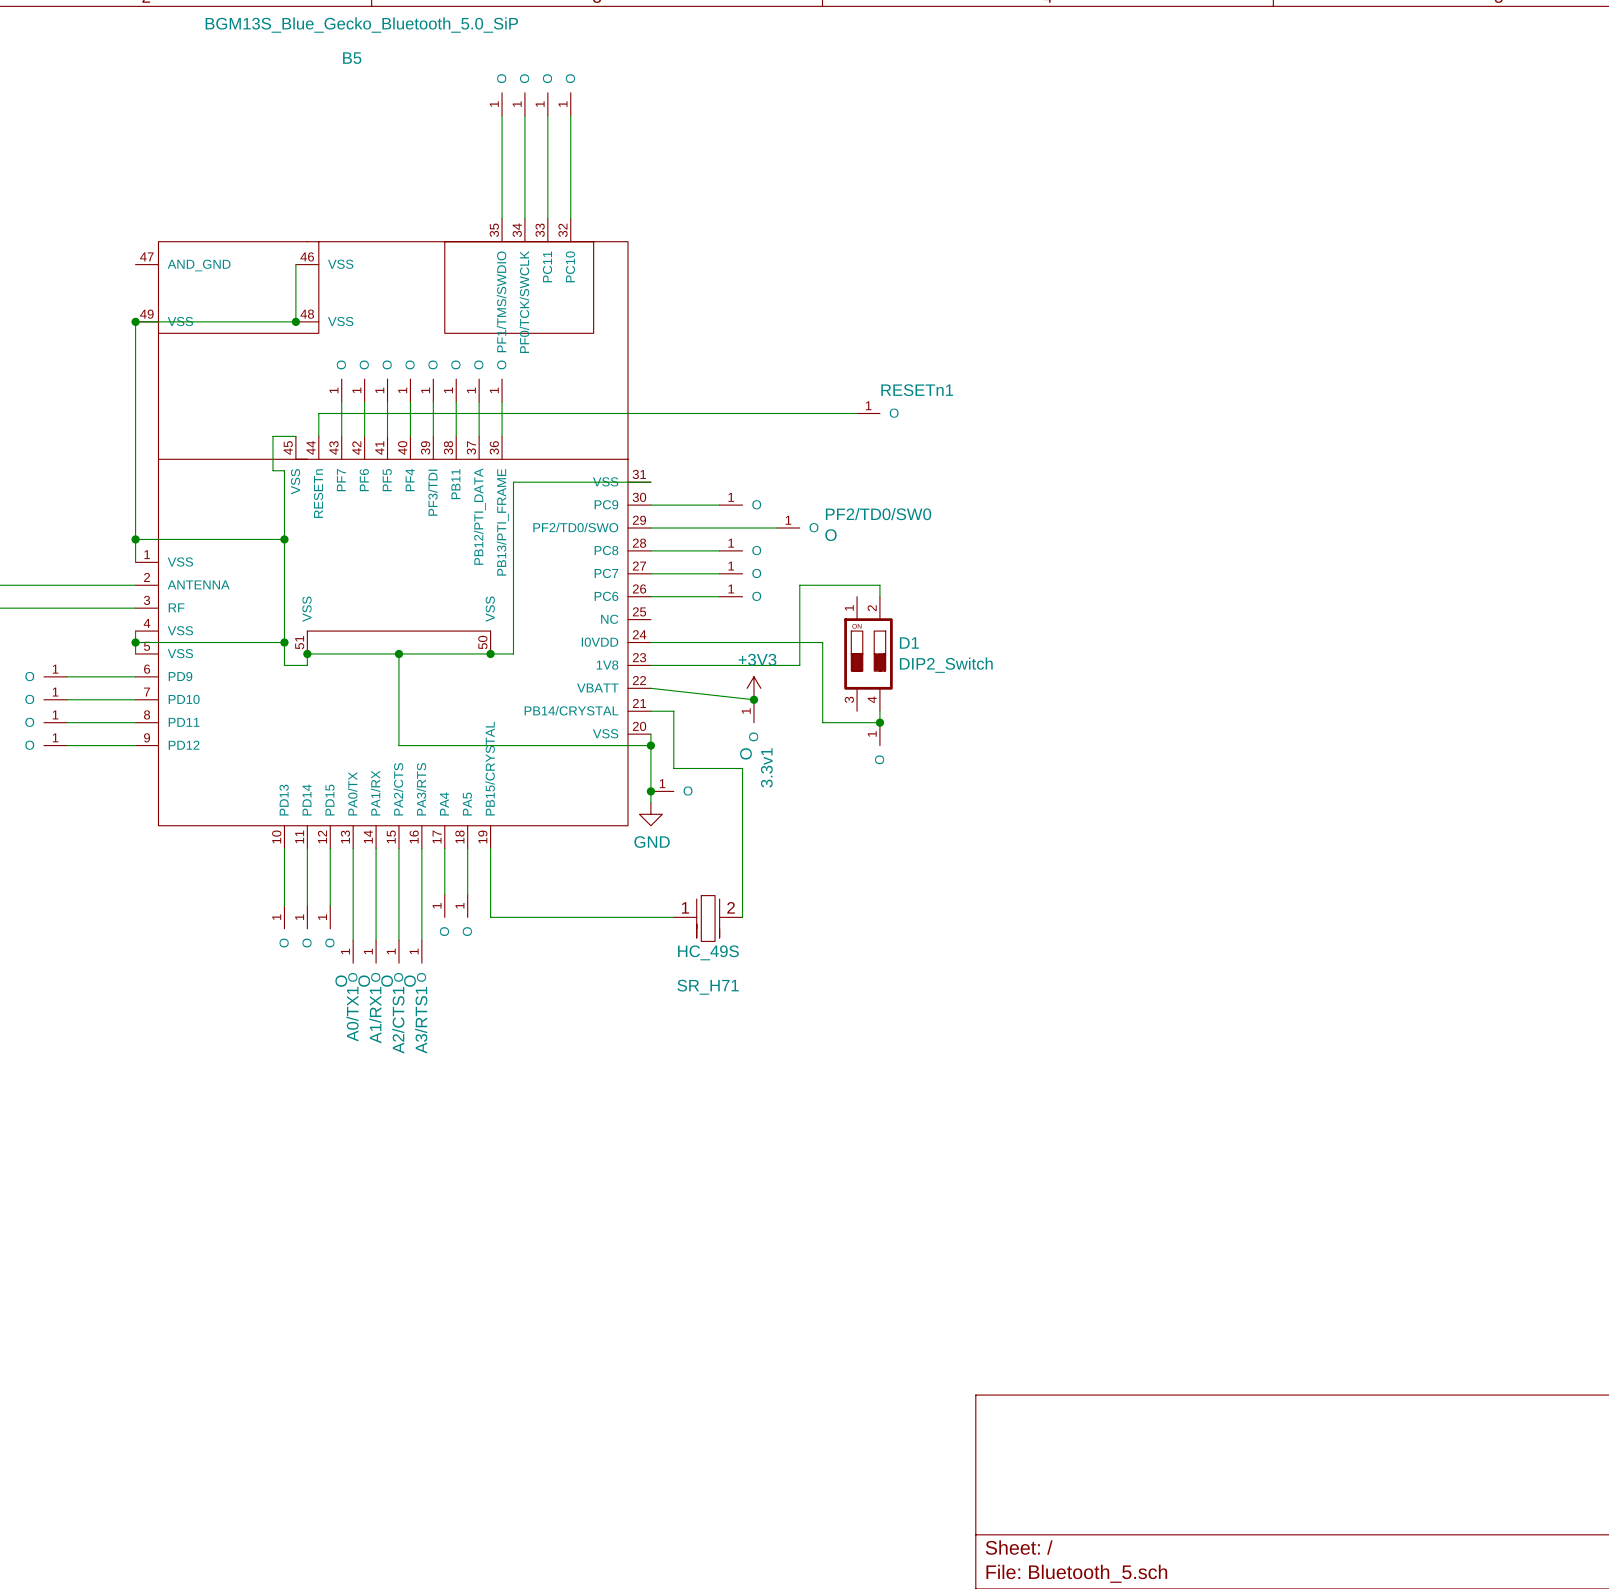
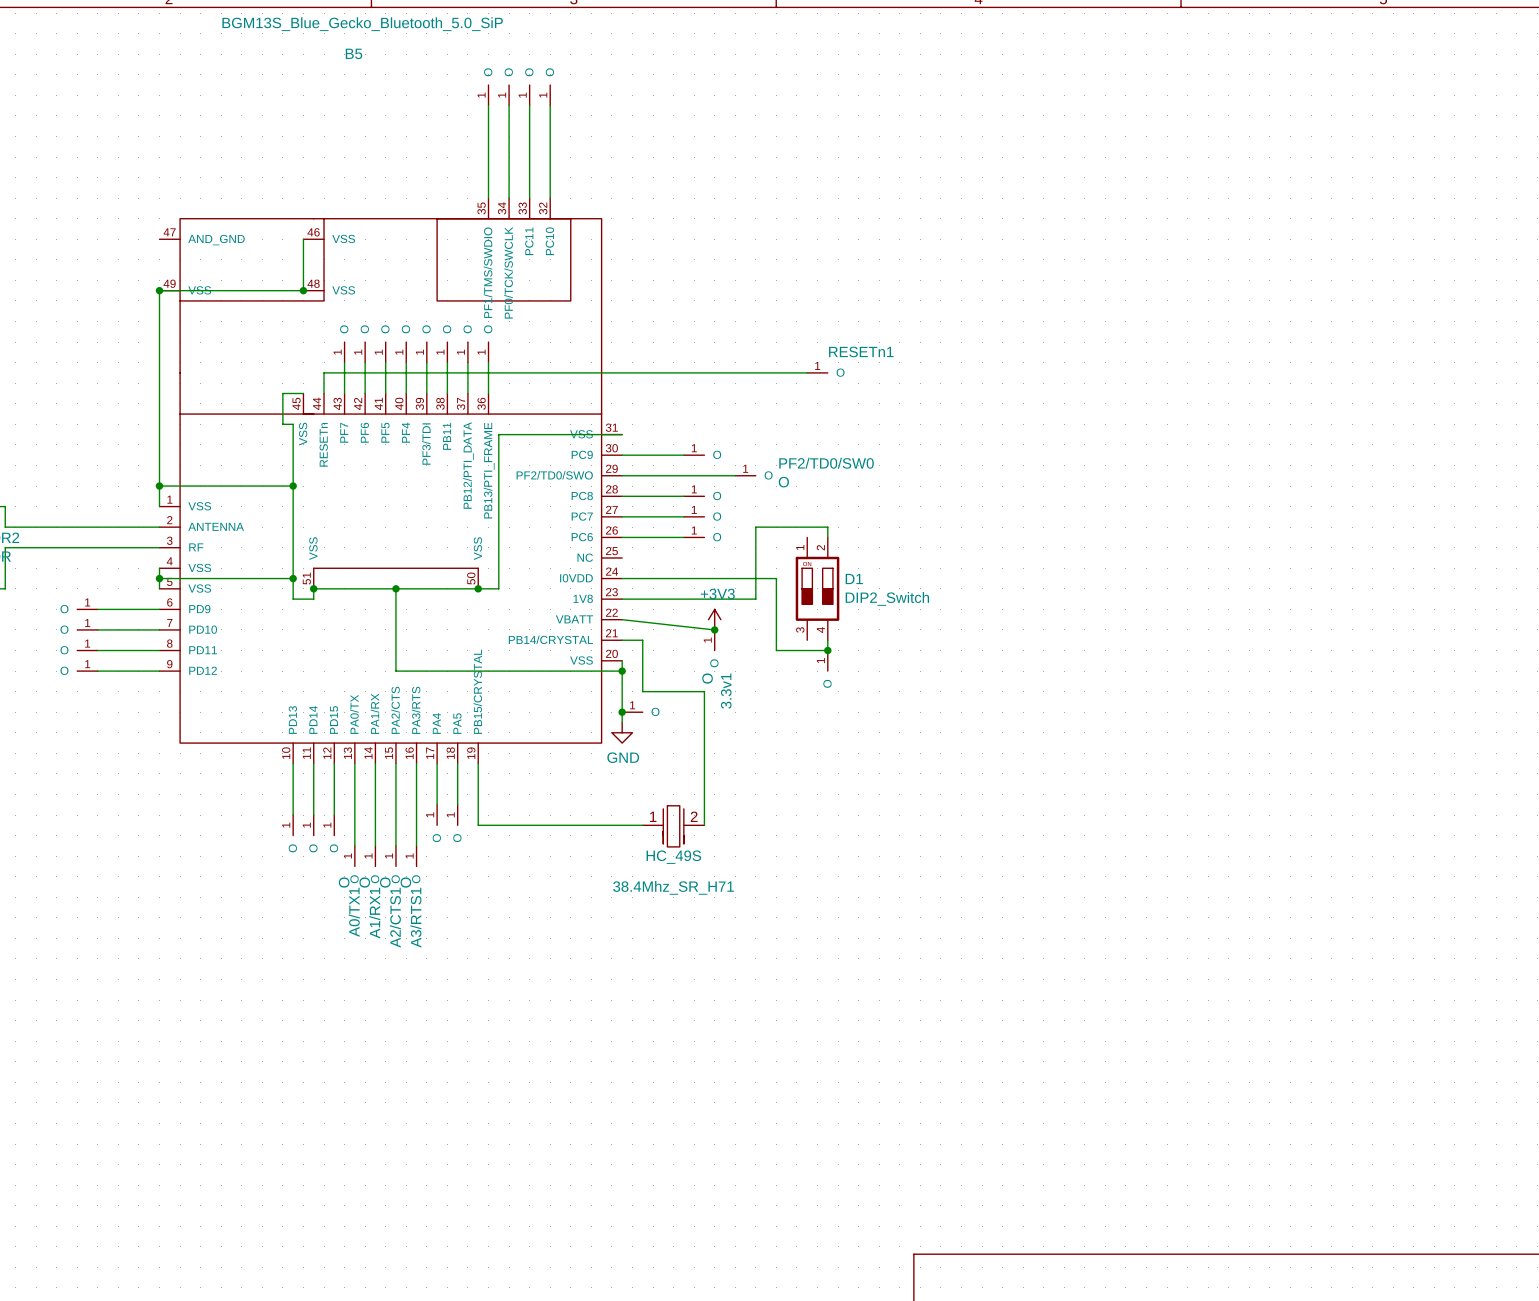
SR_H71 name: SR_H71 (708, 987) -> 38.4Mhz_SR_H71 (673, 887)

